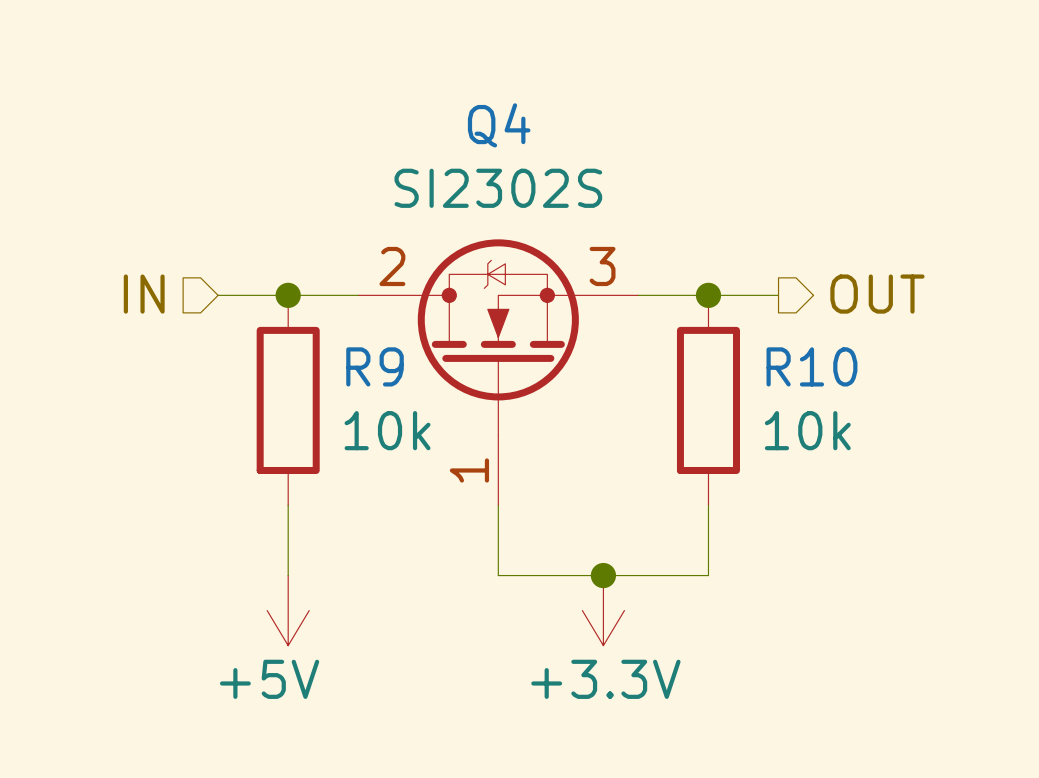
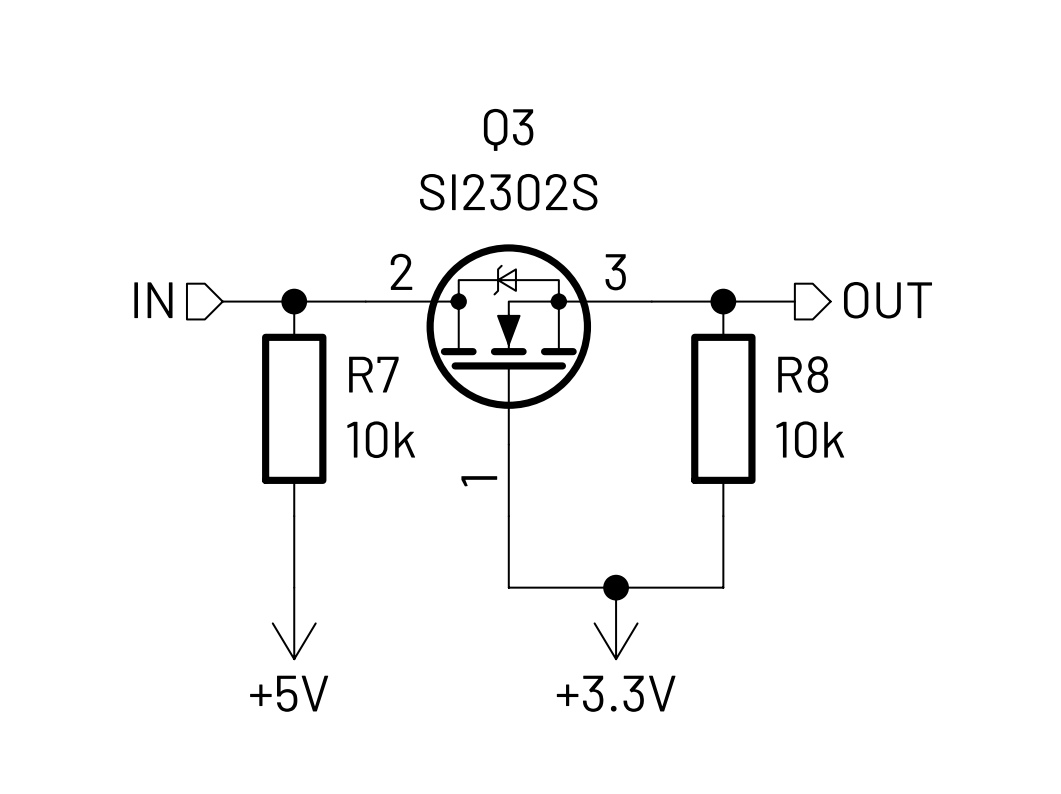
Q4 name: Q4 (499, 125) -> Q3 (508, 129)
R9 name: R9 (375, 366) -> R7 (373, 374)
R10 name: R10 (811, 366) -> R8 (803, 374)

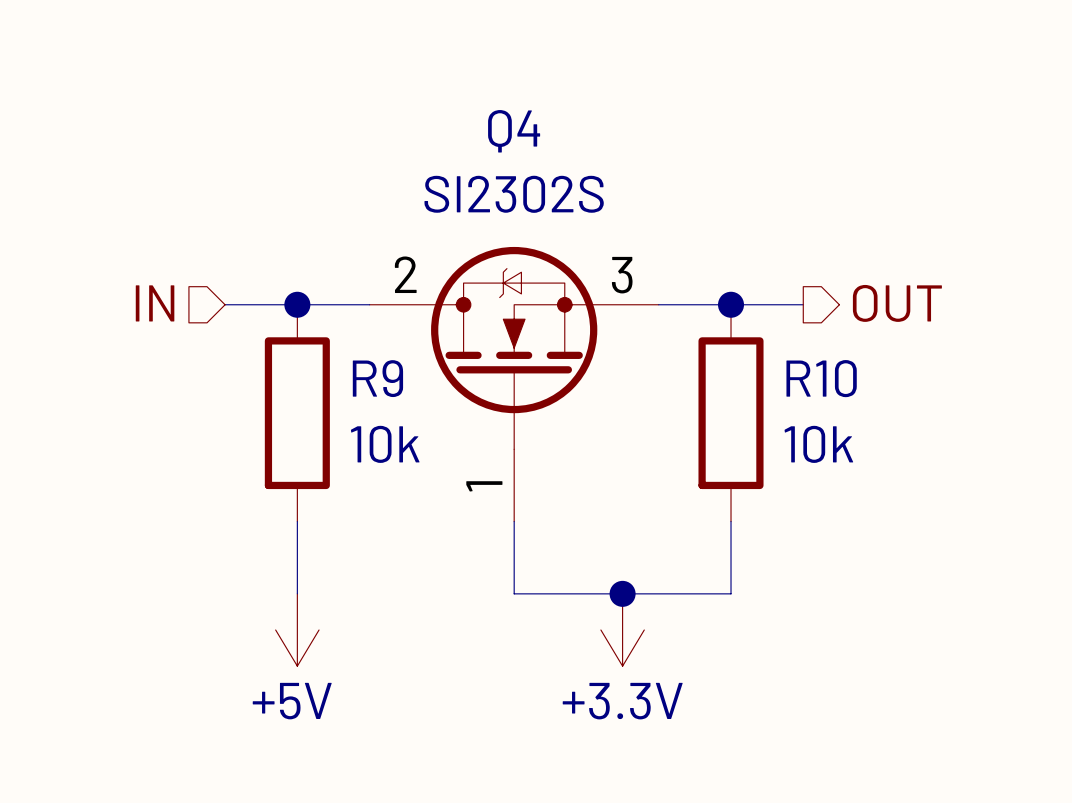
Q3 name: Q3 (508, 129) -> Q4 (514, 131)
R7 name: R7 (373, 374) -> R9 (377, 378)
R8 name: R8 (803, 374) -> R10 (821, 378)

